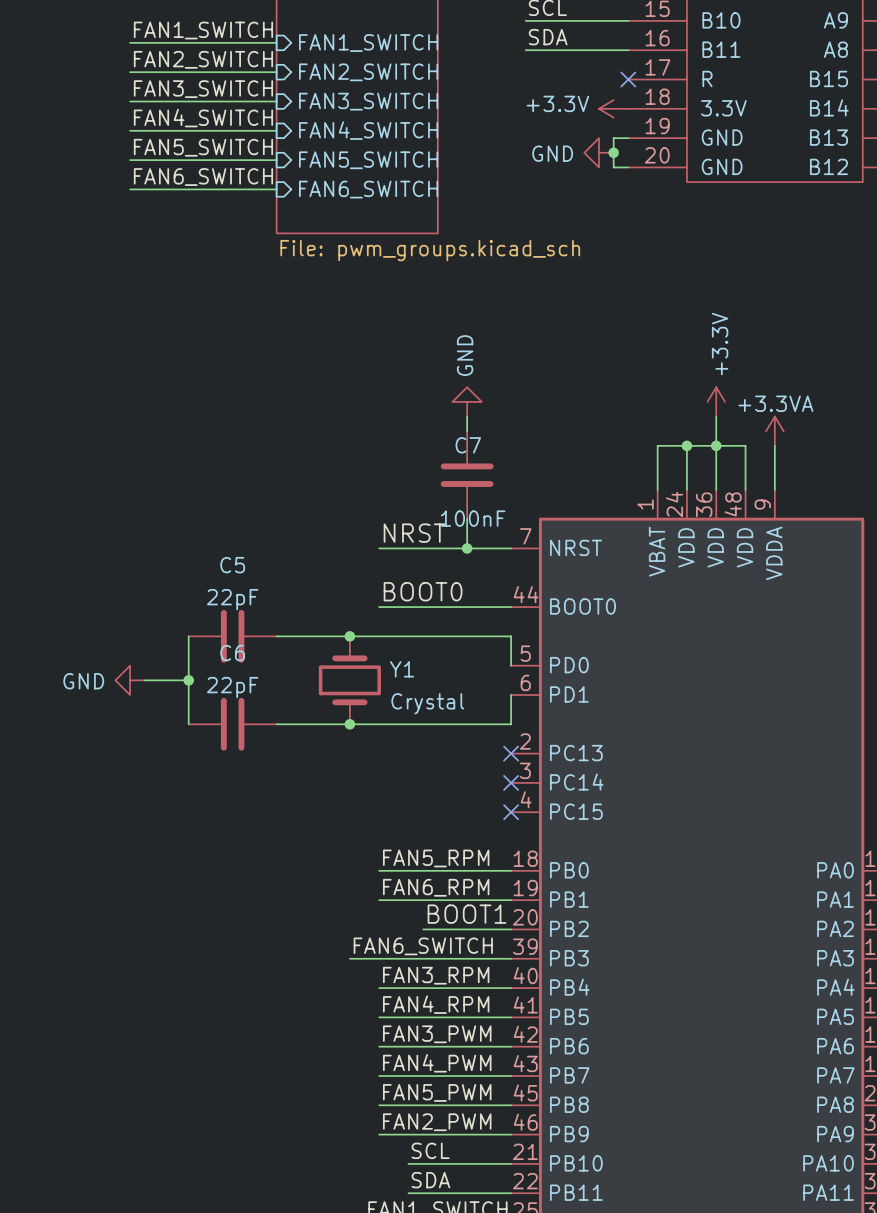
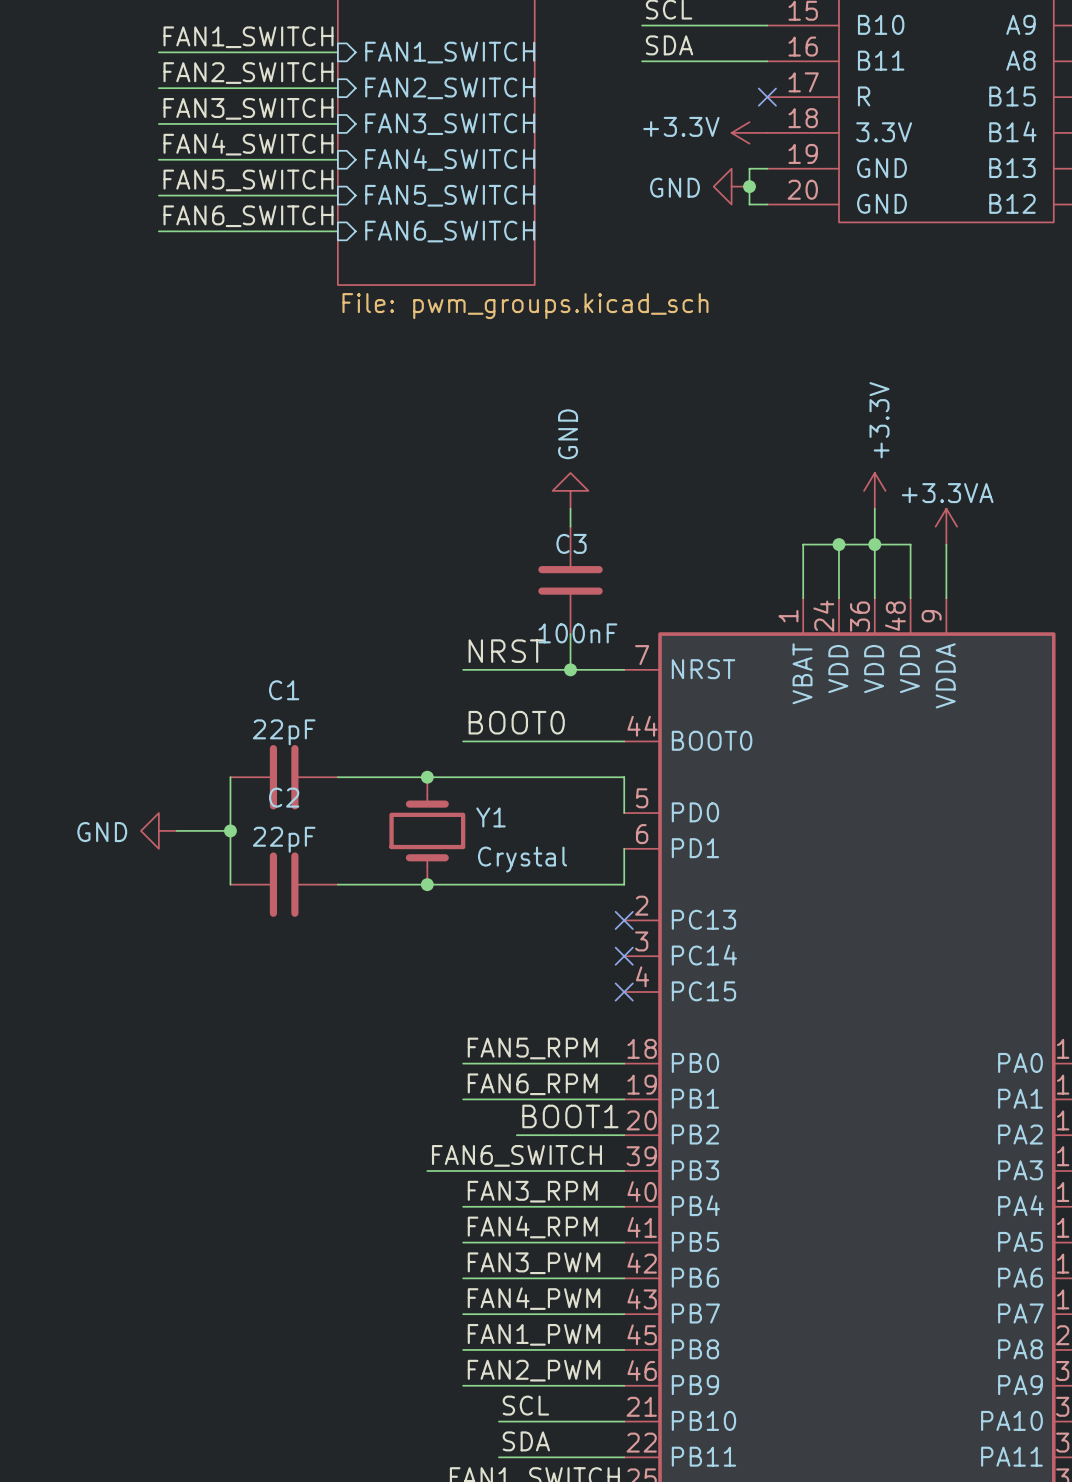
C7 name: C7 (468, 445) -> C3 (571, 543)
C5 name: C5 (232, 565) -> C1 (284, 690)
C6 name: C6 (232, 653) -> C2 (284, 797)
label: FAN5_PWM (437, 1092) -> FAN1_PWM (534, 1334)

